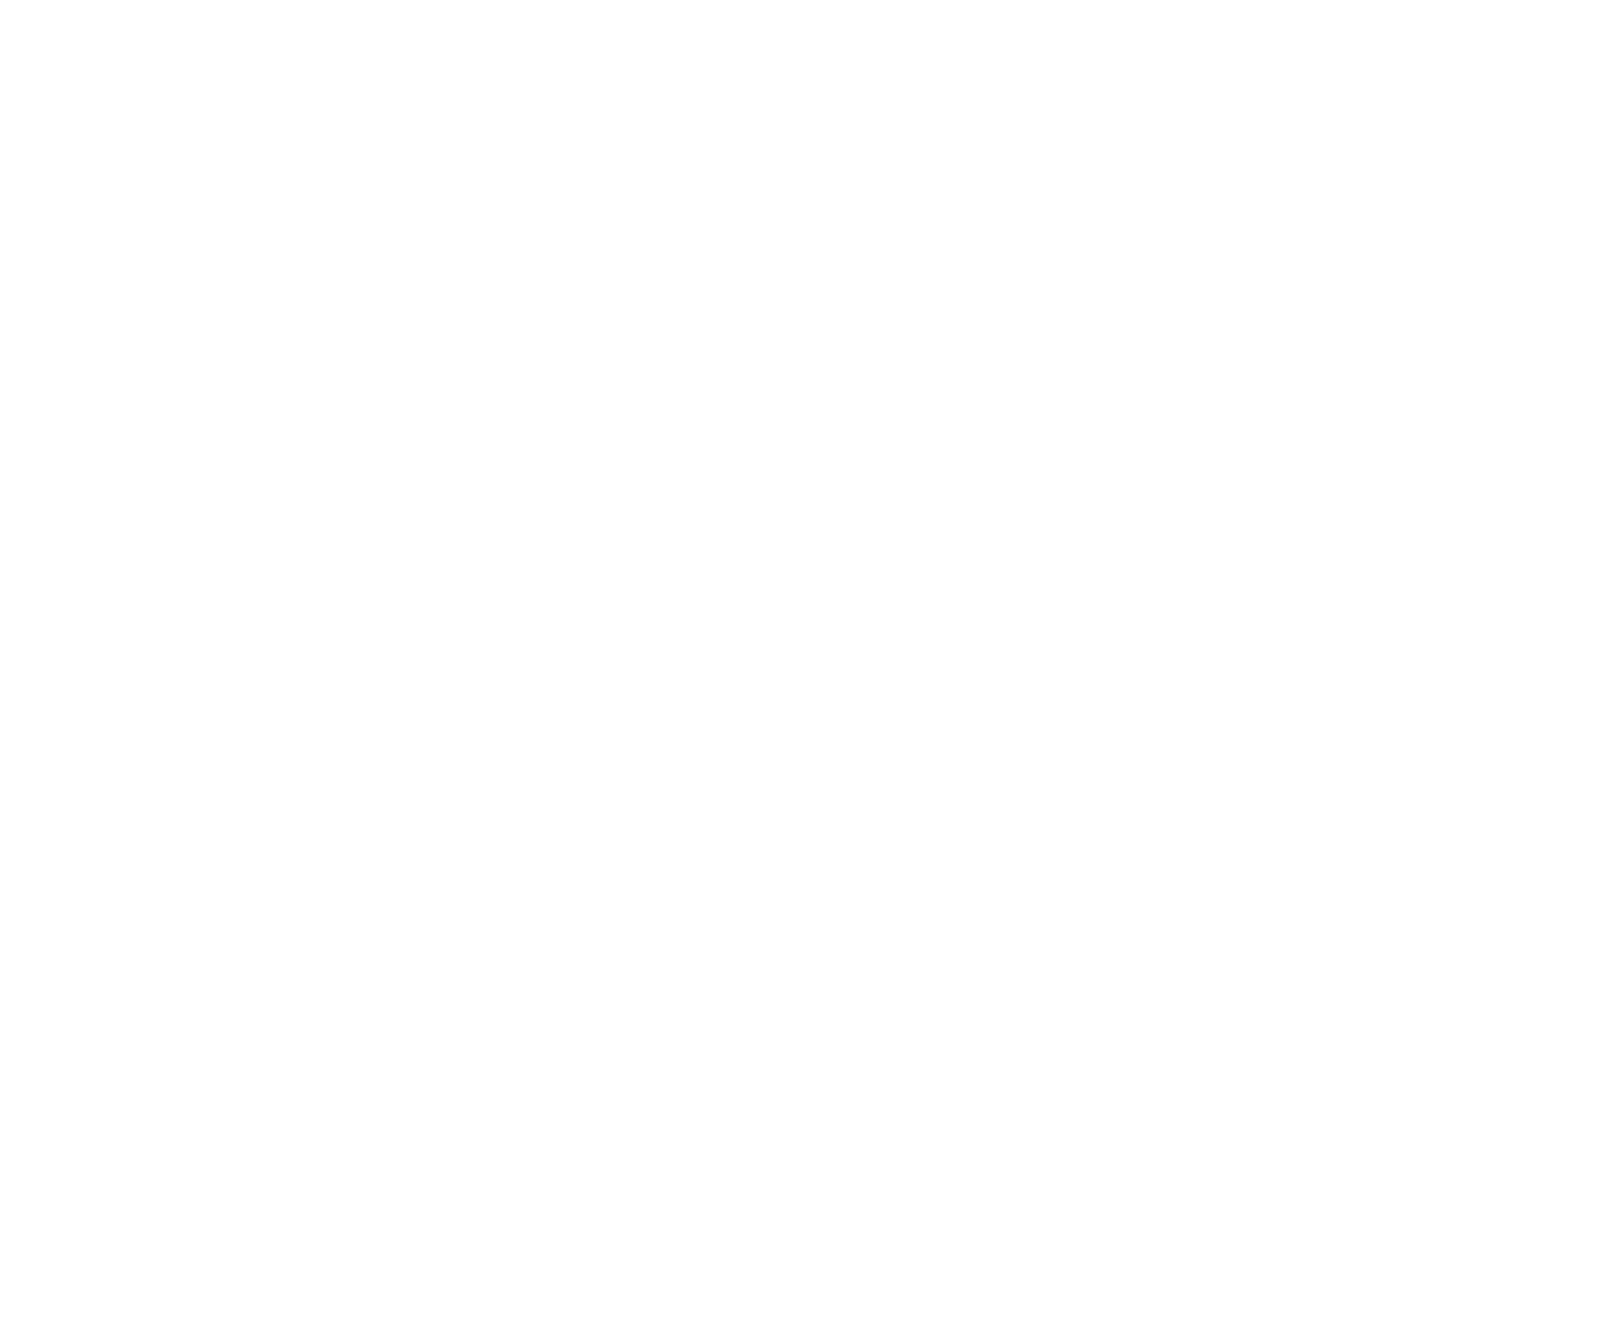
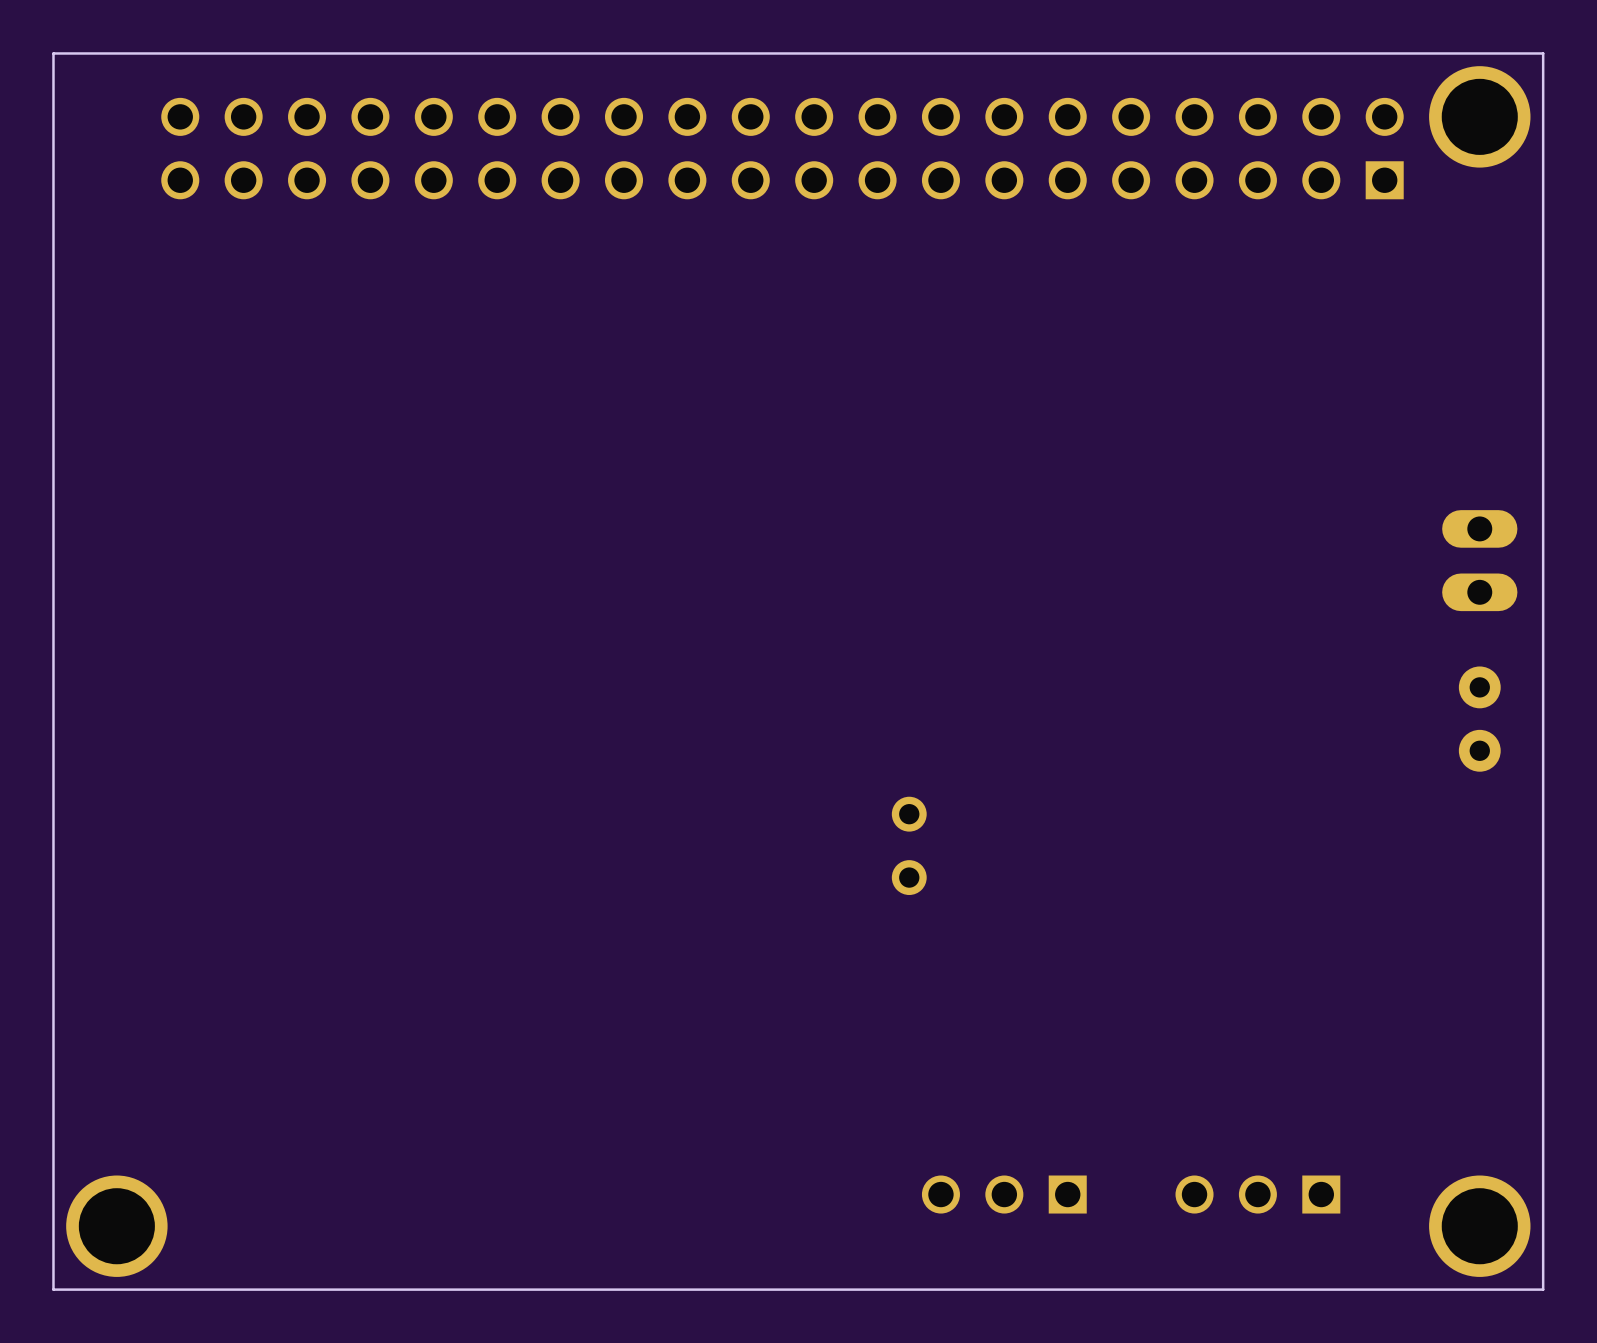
board edge: none -> (1543, 53) (1543, 1289) (53, 1289) (53, 53) (1543, 53)
part: none -> (1479, 116)
part: none -> (782, 148)
part: none -> (1479, 560)
part: none -> (1479, 719)
part: none -> (909, 845)
part: none -> (1004, 1194)
part: none -> (1257, 1194)
part: none -> (116, 1226)
part: none -> (1479, 1226)

